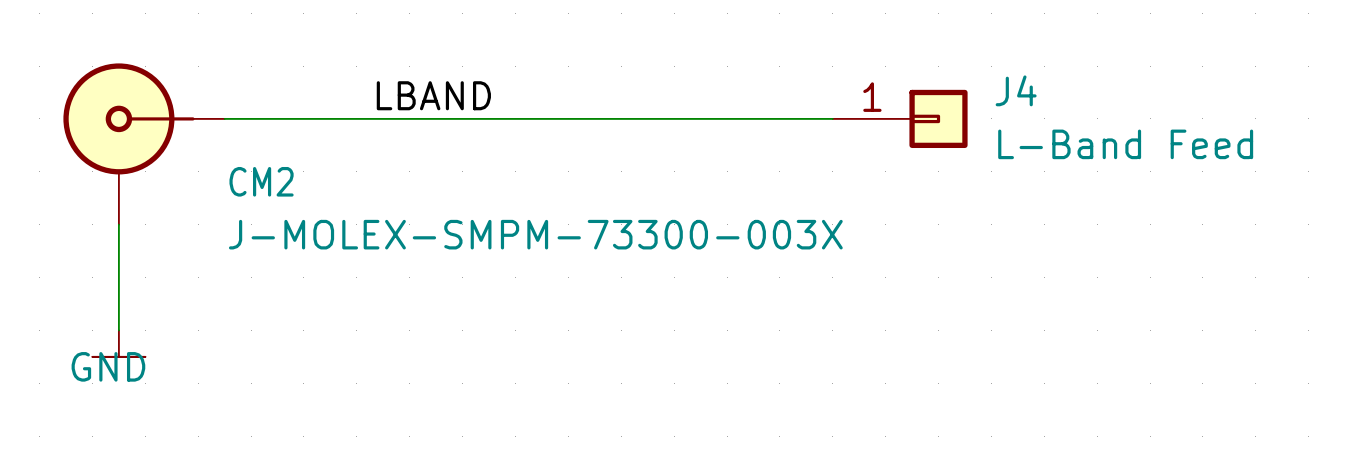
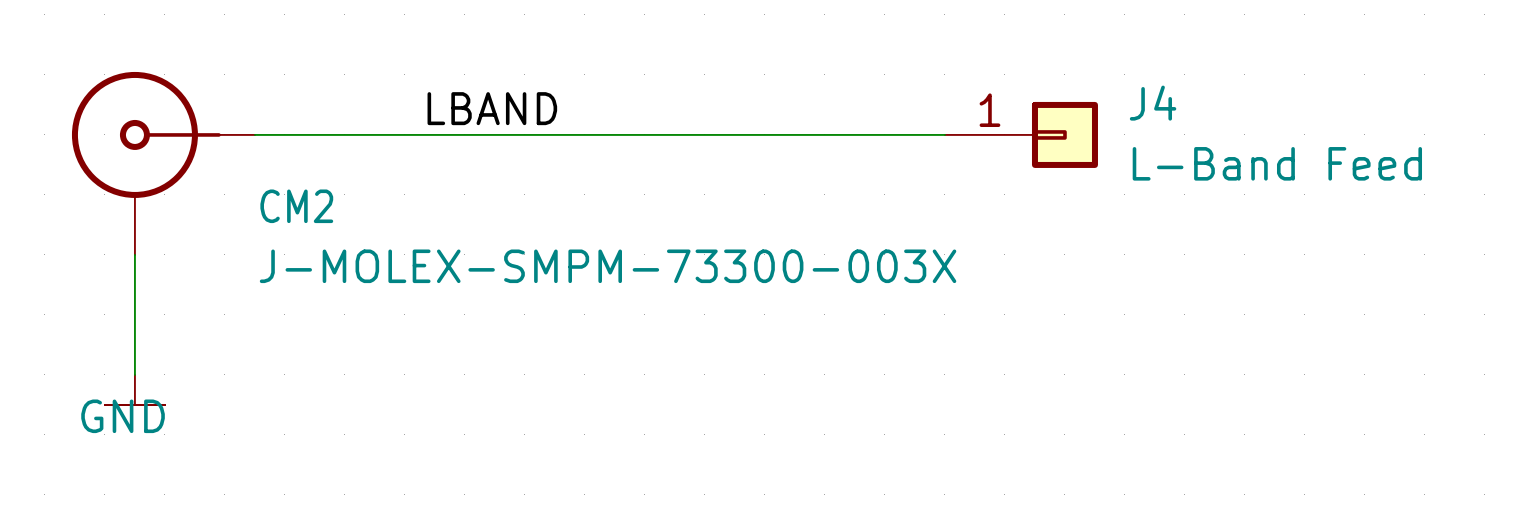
CM2 symbol: [63, 63, 225, 225] -> [71, 71, 255, 255]

